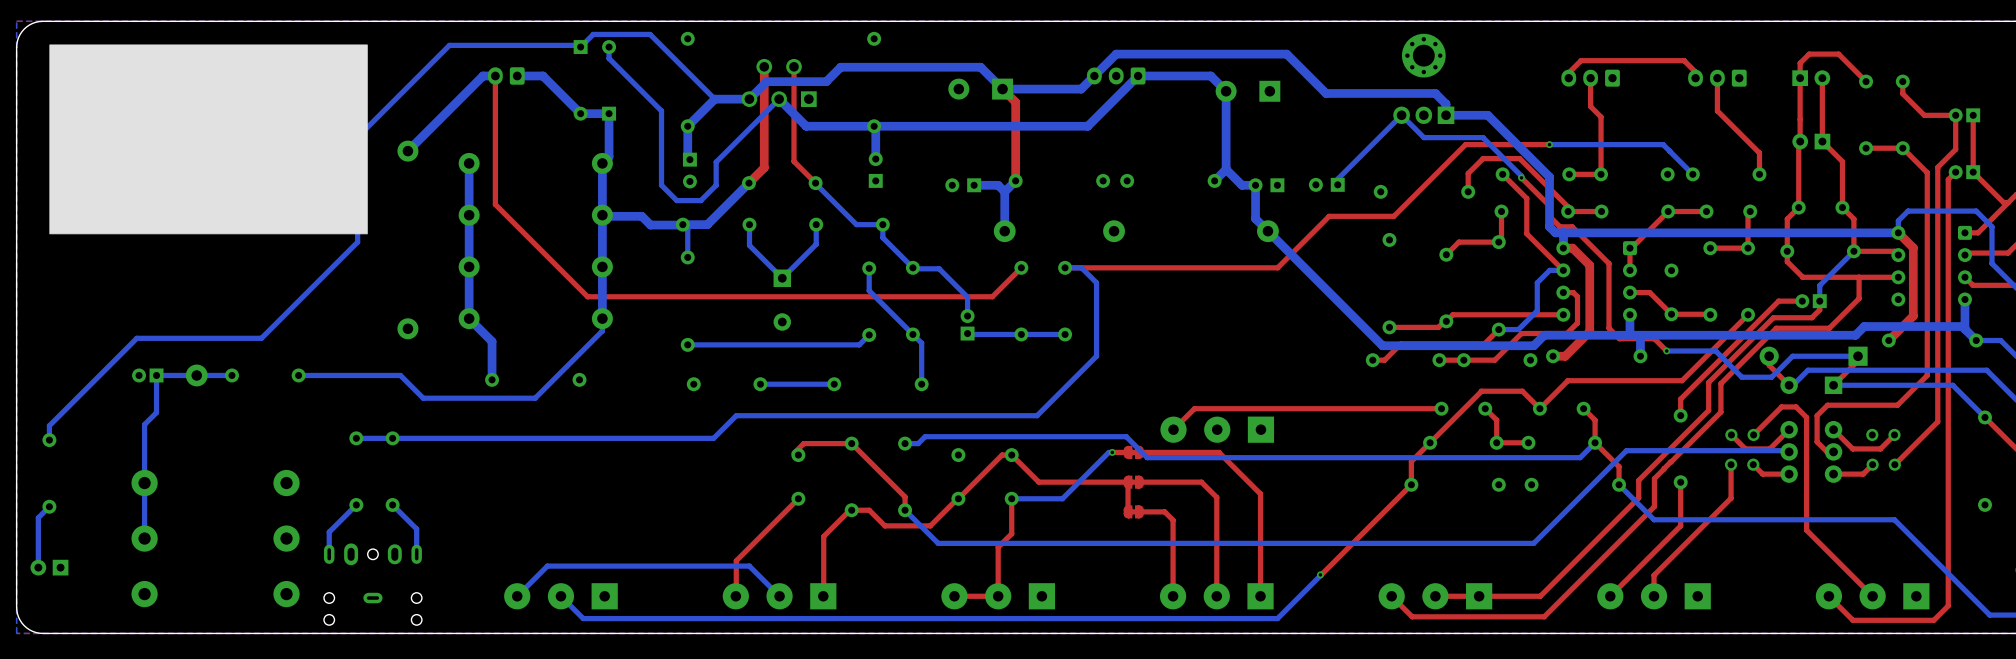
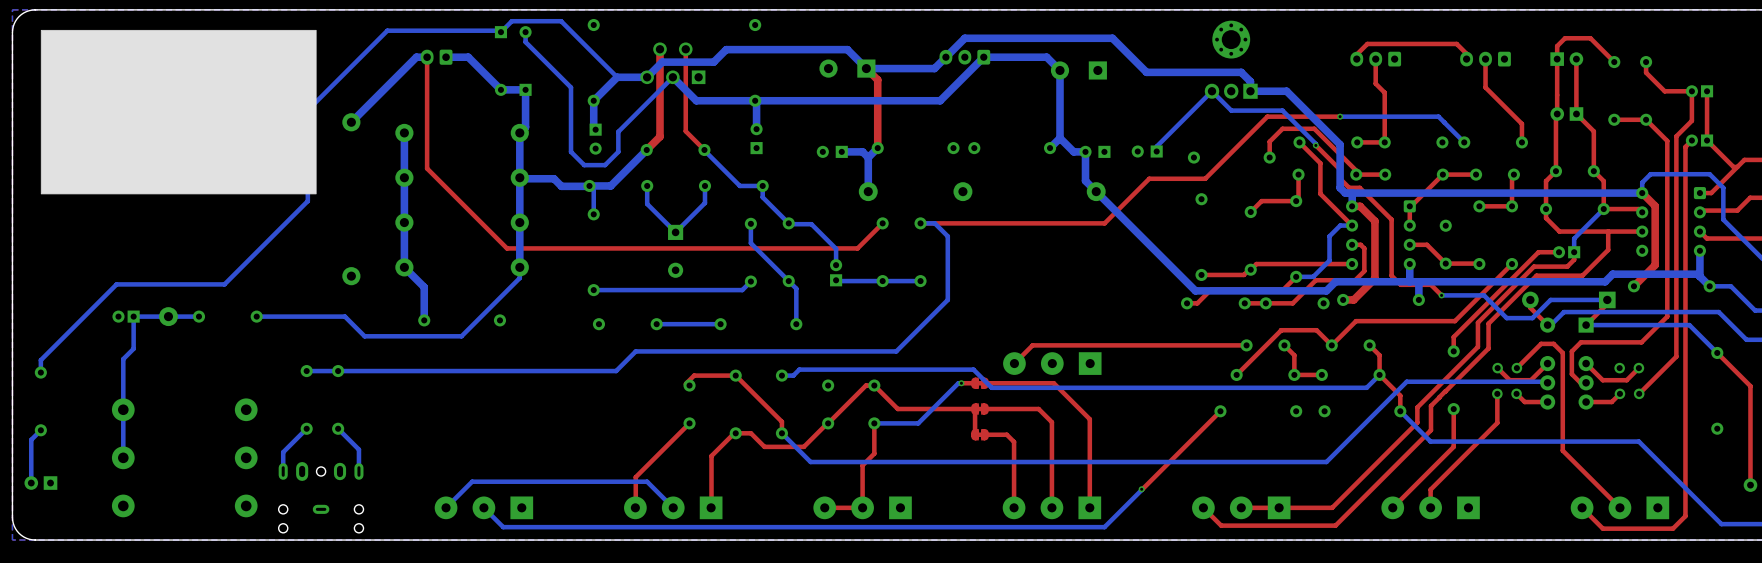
top track: (1430, 442) (1411, 461) (1411, 484) -> none

